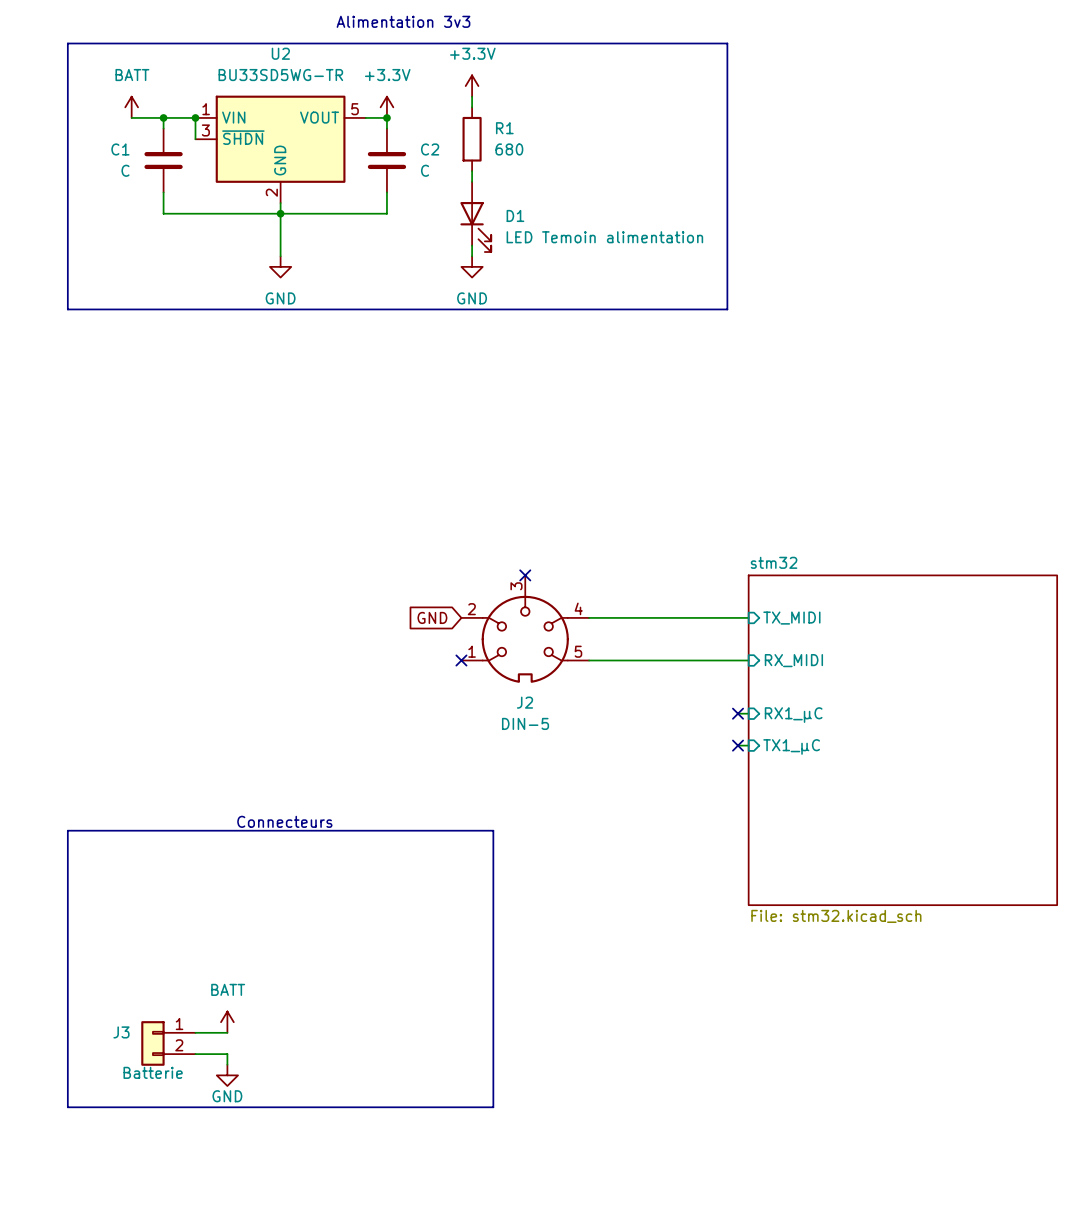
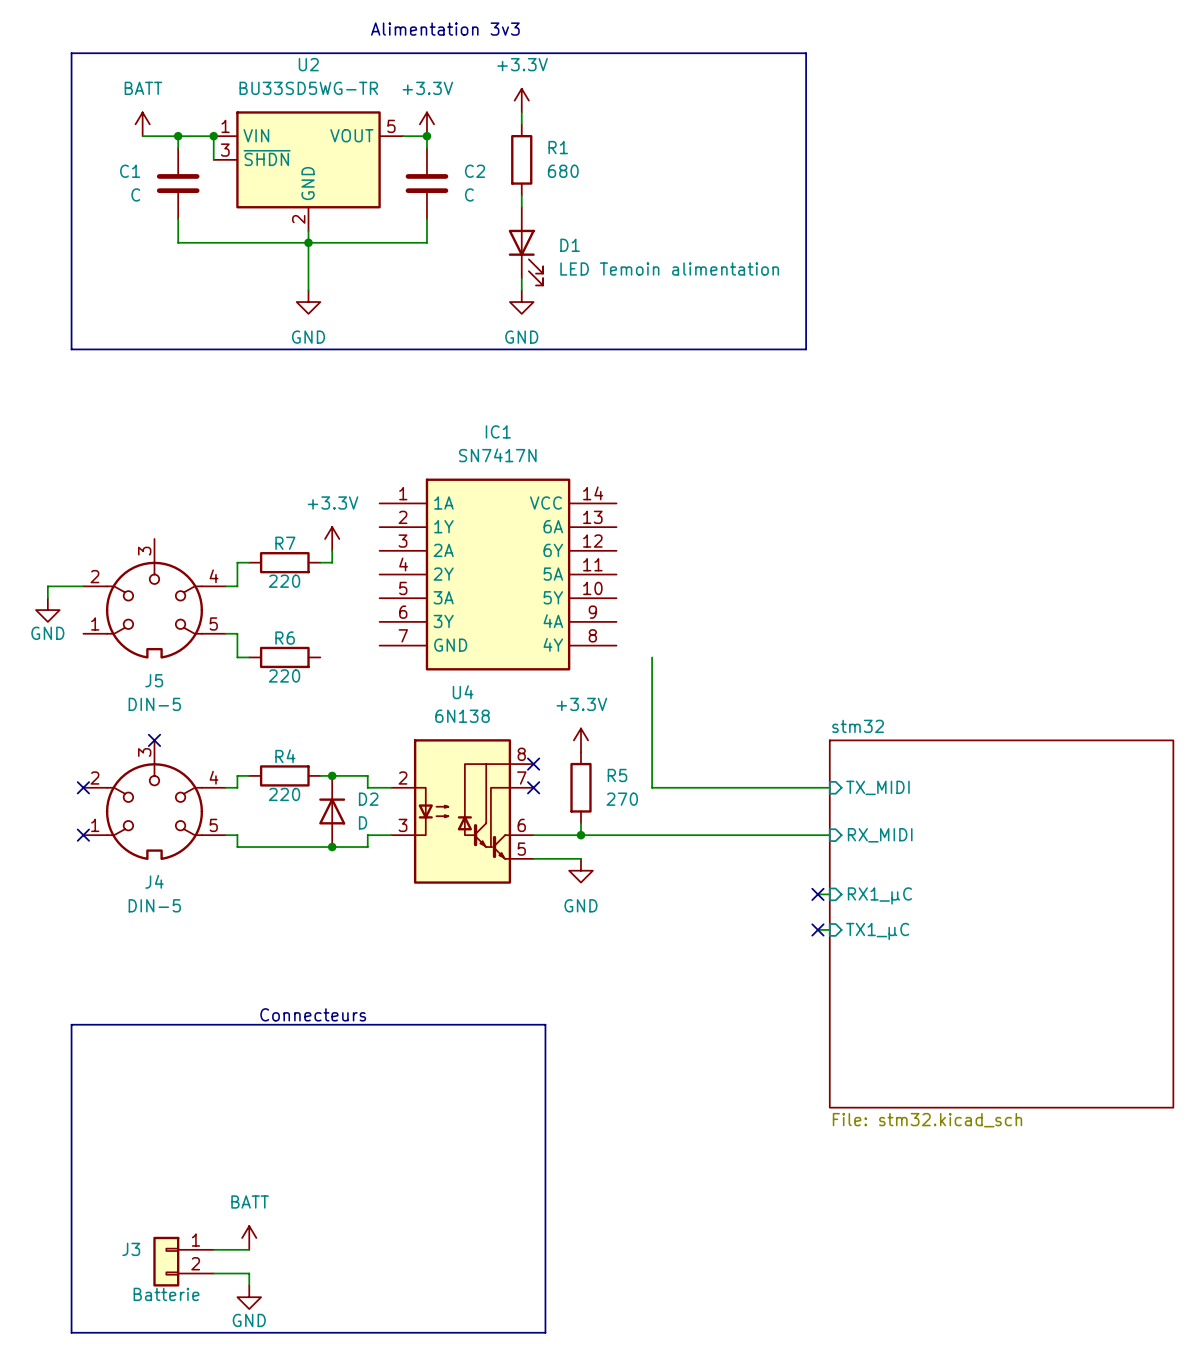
power symbol: none -> +3.3V (332, 538)
wire: none -> (332, 550) (332, 562) (320, 562)
wire: none -> (249, 562) (237, 562) (237, 586) (225, 586)
R7: none -> 220 (284, 562)
IC1: none -> SN7417N (498, 574)
wire: none -> (83, 586) (47, 586) (47, 598)
J5: none -> DIN-5 (154, 598)
power symbol: none -> GND (47, 610)
wire: none -> (225, 633) (237, 633) (237, 657) (249, 657)
no-connect mark: (525, 575) -> none
R6: none -> 220 (284, 657)
wire: none -> (652, 657) (652, 787) (829, 787)
global label: GND (432, 617) -> none
wire: (589, 617) (748, 617) -> none
sheet pin position: TX_MIDI (791, 618) -> TX_MIDI (877, 787)
J2: DIN-5 (525, 629) -> none
no-connect mark: none -> (154, 740)
no-connect mark: (461, 660) -> none
power symbol: none -> +3.3V (580, 740)
wire: (589, 660) (748, 660) -> none
sheet pin: RX_MIDI (793, 660) -> none
no-connect mark: none -> (533, 764)
wire: none -> (249, 775) (237, 775) (237, 787) (225, 787)
R4: none -> 220 (284, 775)
wire: none -> (320, 775) (367, 775) (367, 787) (391, 787)
junction: none -> (332, 775)
no-connect mark: none -> (83, 787)
no-connect mark: none -> (533, 787)
R5: none -> 270 (580, 787)
wire: (738, 713) (748, 713) -> (817, 894) (829, 894)
no-connect mark: (738, 713) -> none
J4: none -> DIN-5 (154, 800)
sheet pin position: RX1_µC (793, 715) -> RX1_µC (879, 895)
D2: none -> D (332, 811)
U4: none -> 6N138 (462, 811)
wire: none -> (580, 823) (580, 835)
sheet stm32 position: (902, 740) -> (1001, 924)
no-connect mark: none -> (83, 835)
wire: none -> (225, 835) (237, 835) (237, 847) (367, 847) (367, 835) (391, 835)
wire: none -> (533, 835) (817, 835)
junction: none -> (580, 835)
no-connect mark: (738, 745) -> none
sheet pin: TX1_µC (791, 746) -> RX_MIDI (880, 835)
junction: none -> (332, 847)
wire: none -> (533, 858) (580, 858)
power symbol: none -> GND (580, 870)
no-connect mark: none -> (817, 894)
text position: Connecteurs (284, 821) -> Connecteurs (313, 1014)
wire: none -> (817, 929) (829, 929)
no-connect mark: none -> (817, 929)
sheet pin: none -> TX1_µC (877, 931)
line: (67, 915) (67, 830) (493, 830) (493, 915) -> (71, 1024) (545, 1024)
power symbol position: BATT (227, 1022) -> BATT (249, 1237)
wire: (195, 1032) (227, 1032) -> (213, 1249) (249, 1249)
J3 position: (168, 1043) -> (183, 1261)
wire: (195, 1054) (227, 1054) (227, 1064) -> (213, 1273) (249, 1273) (249, 1285)
power symbol position: GND (227, 1075) -> GND (249, 1297)
line: (67, 1107) (493, 1107) -> (71, 1237) (71, 1332) (545, 1332) (545, 1237)

